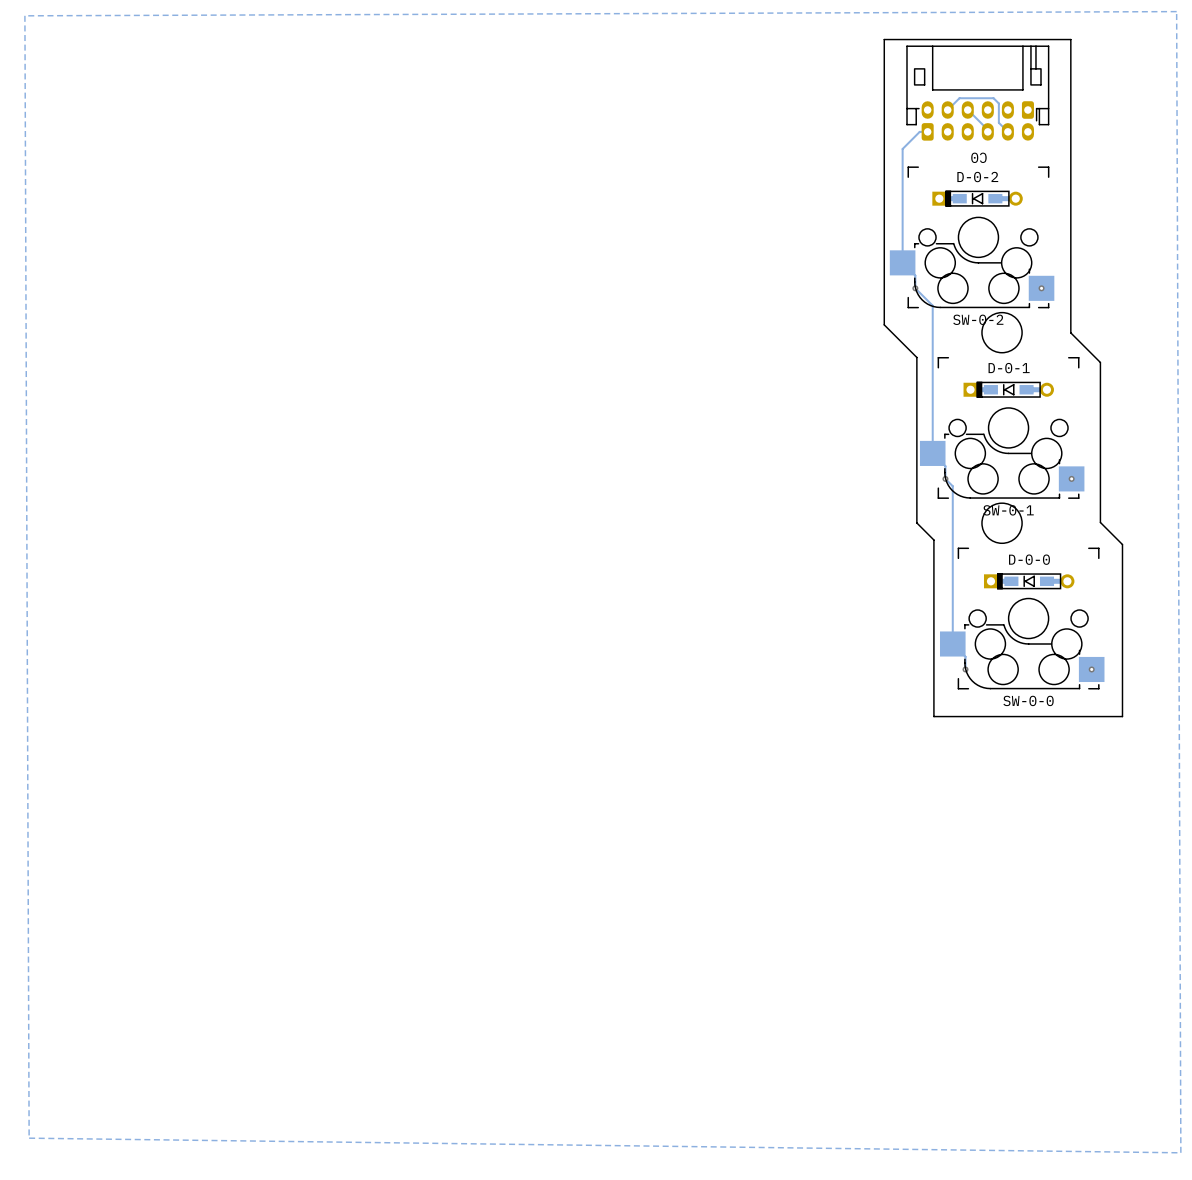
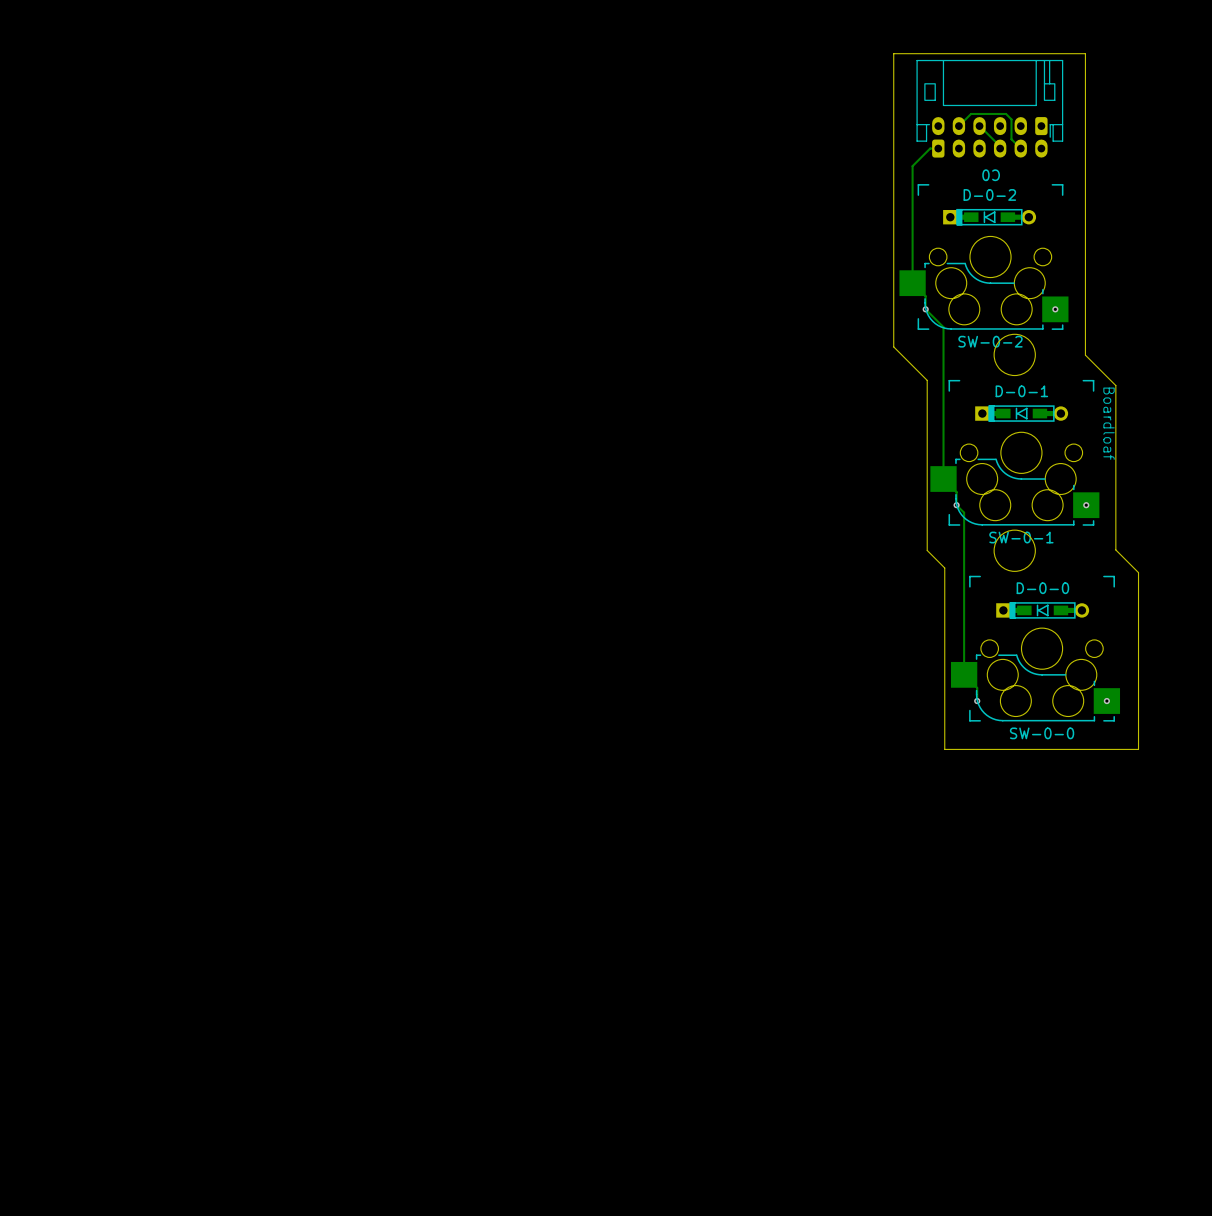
zone outline: (1176, 11) (24, 15) (29, 1138) (1180, 1152) (1176, 11) -> none
text: none -> Boardloaf (1109, 423)

